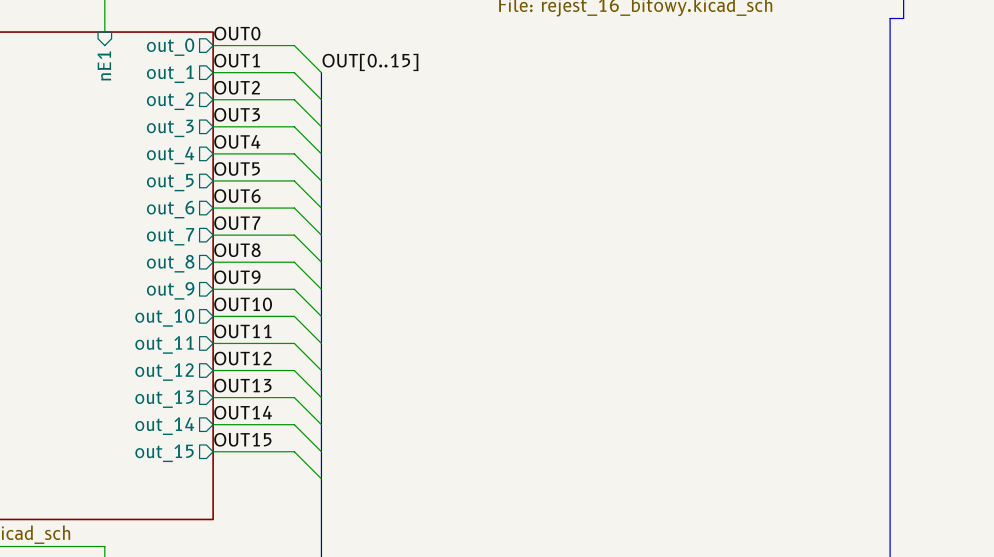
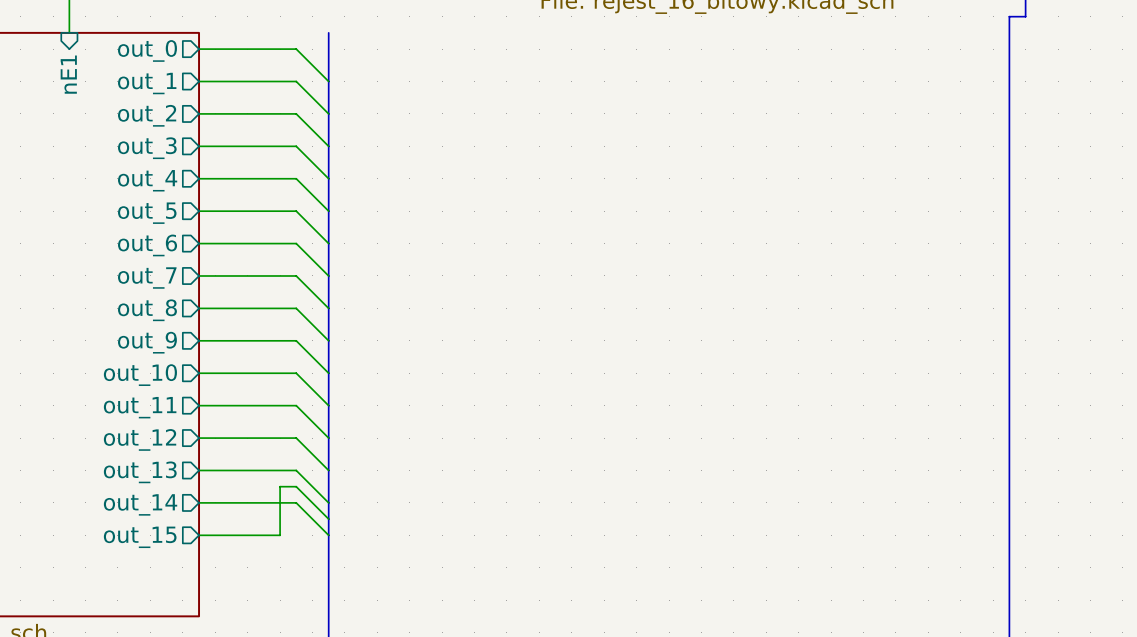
bus: none -> (328, 32) (328, 81)
label: OUT0 (237, 33) -> none
label: OUT1 (237, 60) -> none
label: OUT[0..15] (370, 62) -> none
label: OUT2 (237, 87) -> none
label: OUT3 (237, 114) -> none
label: OUT4 (237, 141) -> none
label: OUT5 (237, 168) -> none
label: OUT6 (237, 196) -> none
label: OUT7 (237, 223) -> none
label: OUT8 (237, 250) -> none
label: OUT9 (237, 277) -> none
label: OUT10 (243, 304) -> none
label: OUT11 (242, 331) -> none
label: OUT12 (242, 358) -> none
label: OUT13 (242, 385) -> none
label: OUT14 (243, 412) -> none
label: OUT15 (242, 439) -> none
wire: (280, 451) (294, 451) (321, 478) -> (280, 535) (280, 486) (296, 486) (328, 519)

